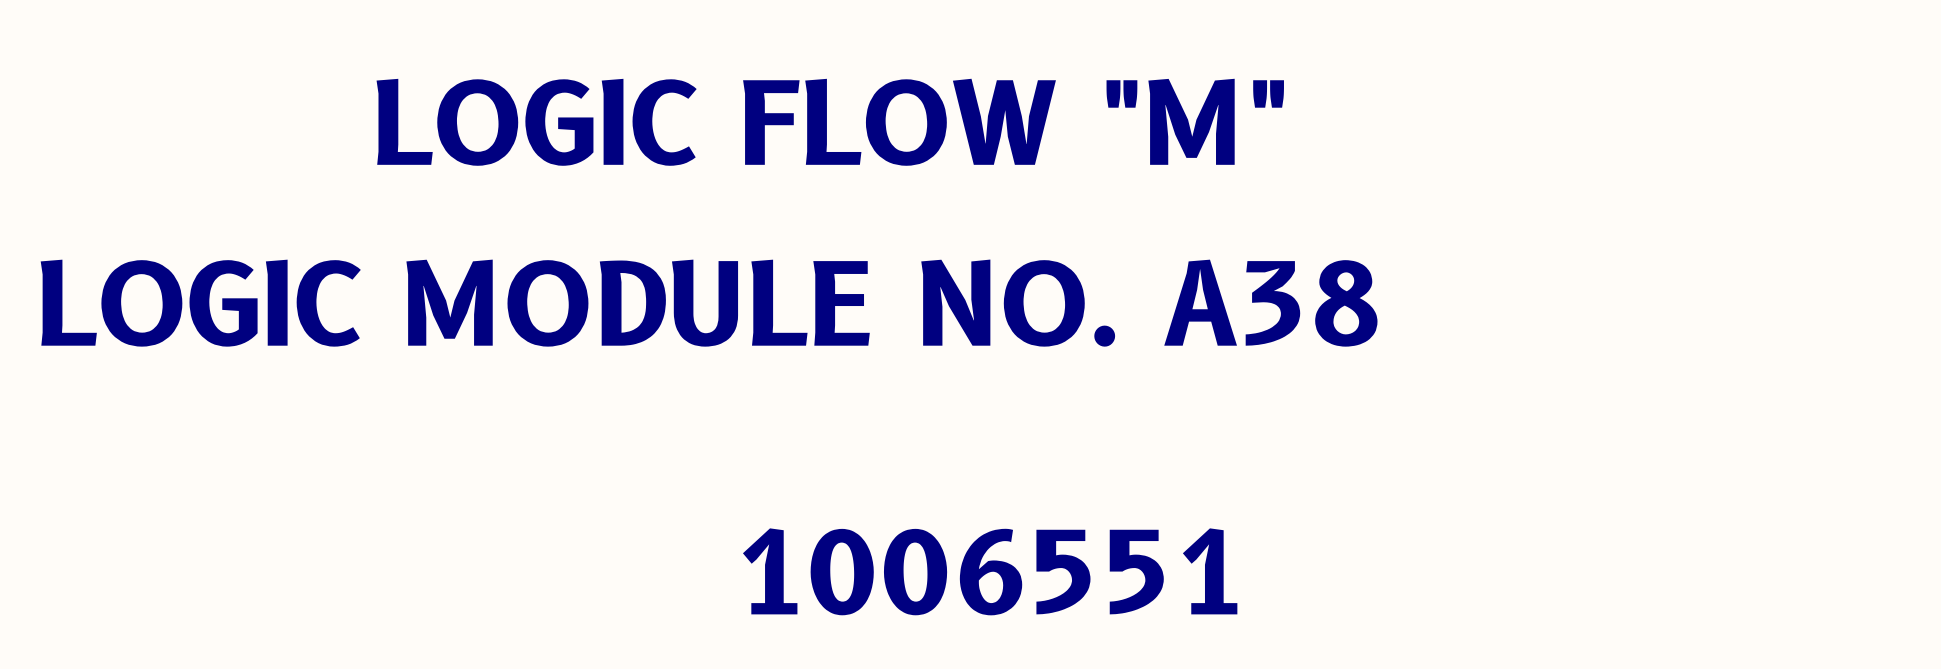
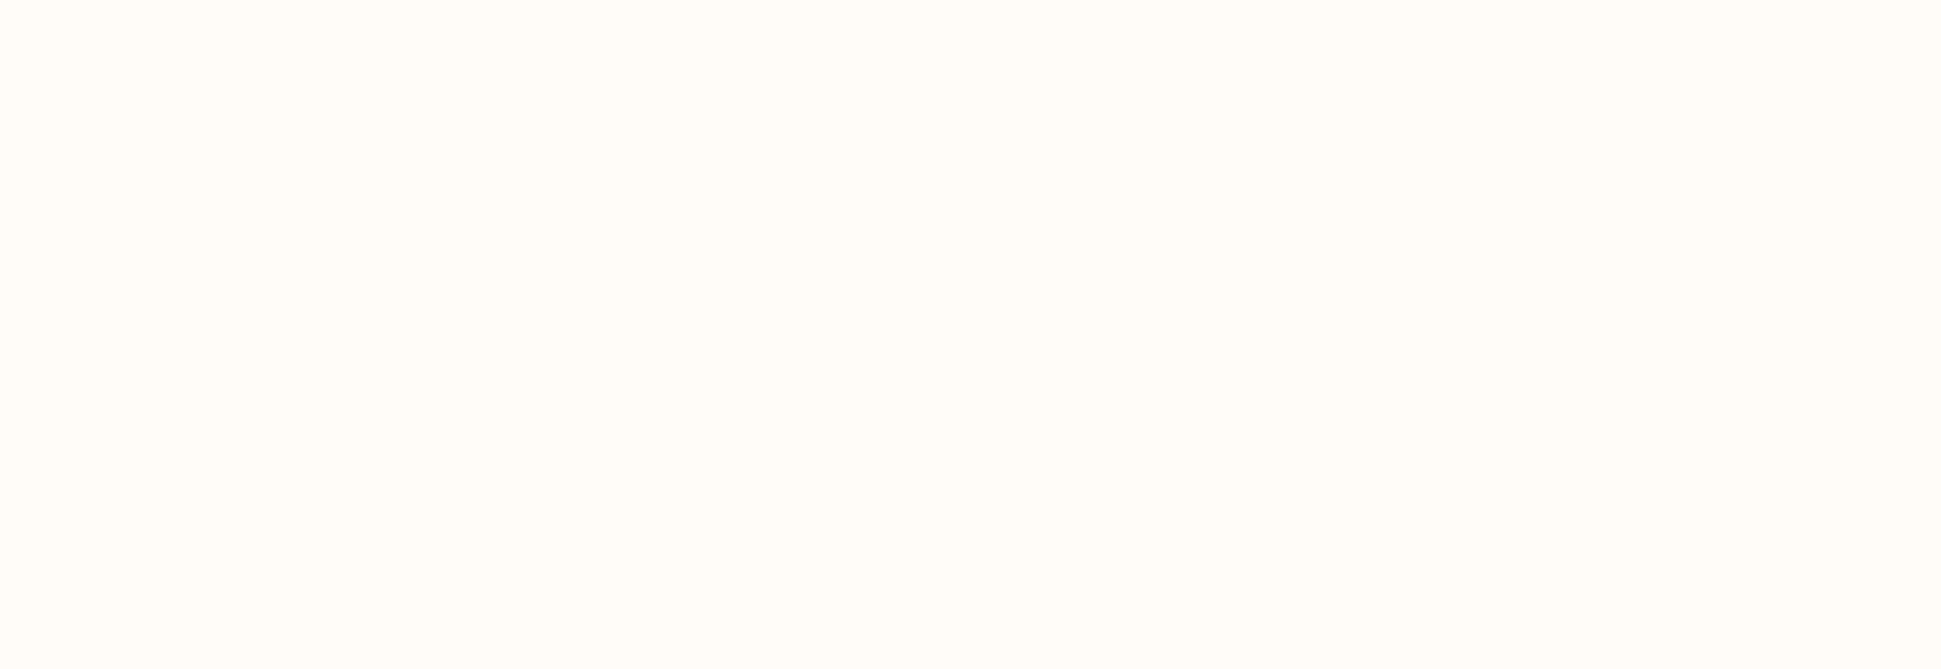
text: LOGIC FLOW "M" (830, 122) -> none
text: LOGIC MODULE NO. A38 (709, 303) -> none
text: 1006551 (990, 571) -> none

